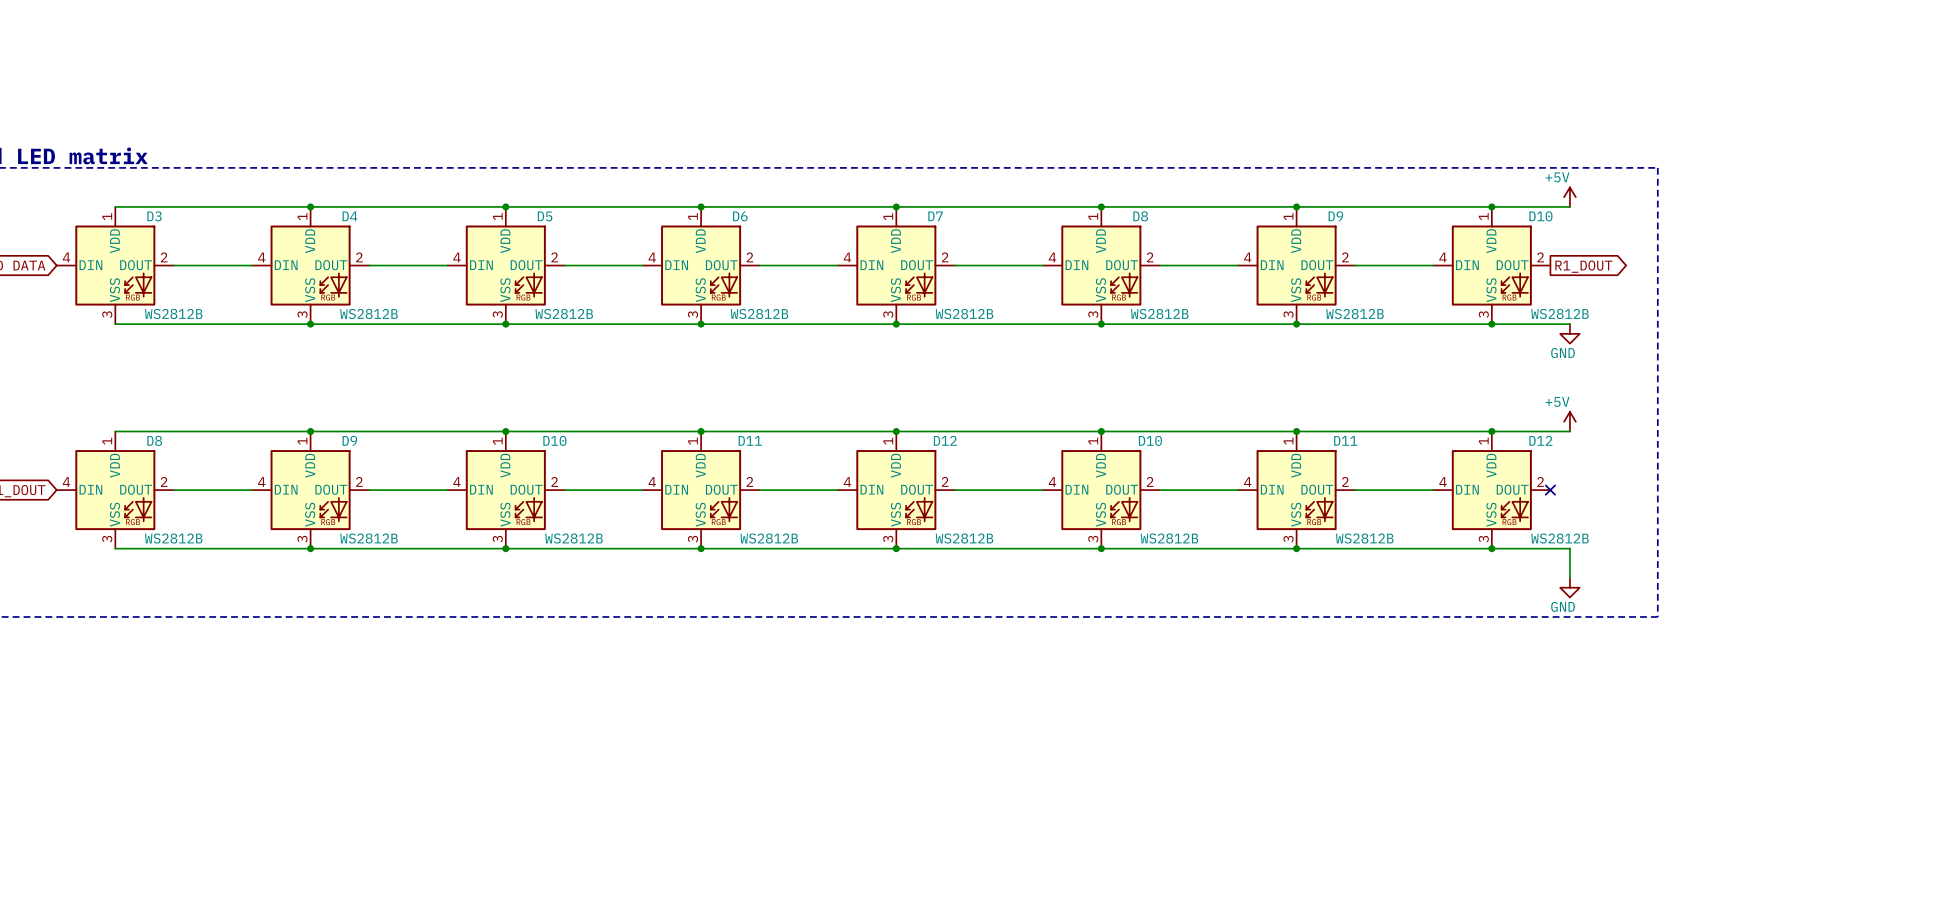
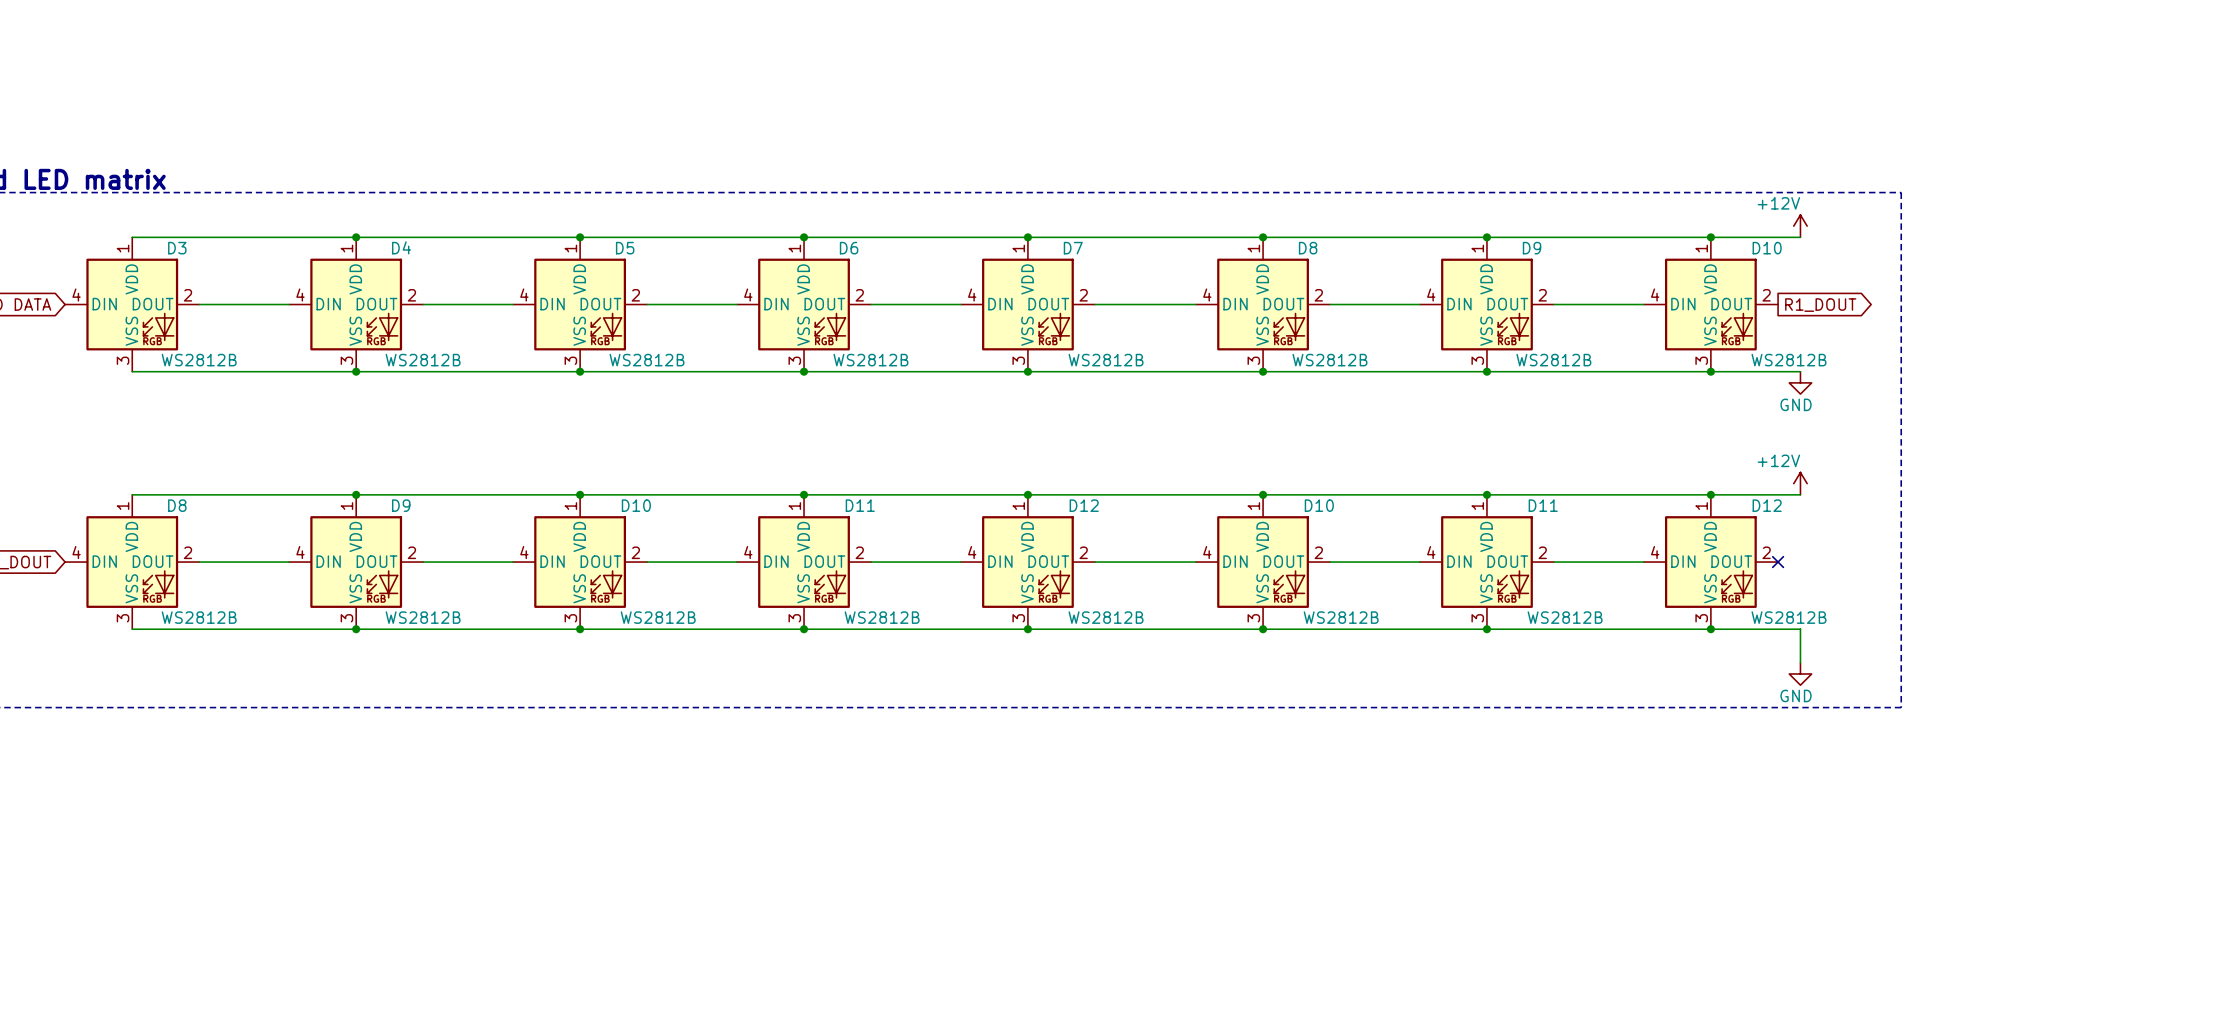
power symbol: +5V (1569, 197) -> +12V (1800, 226)
power symbol: +5V (1569, 421) -> +12V (1800, 483)

